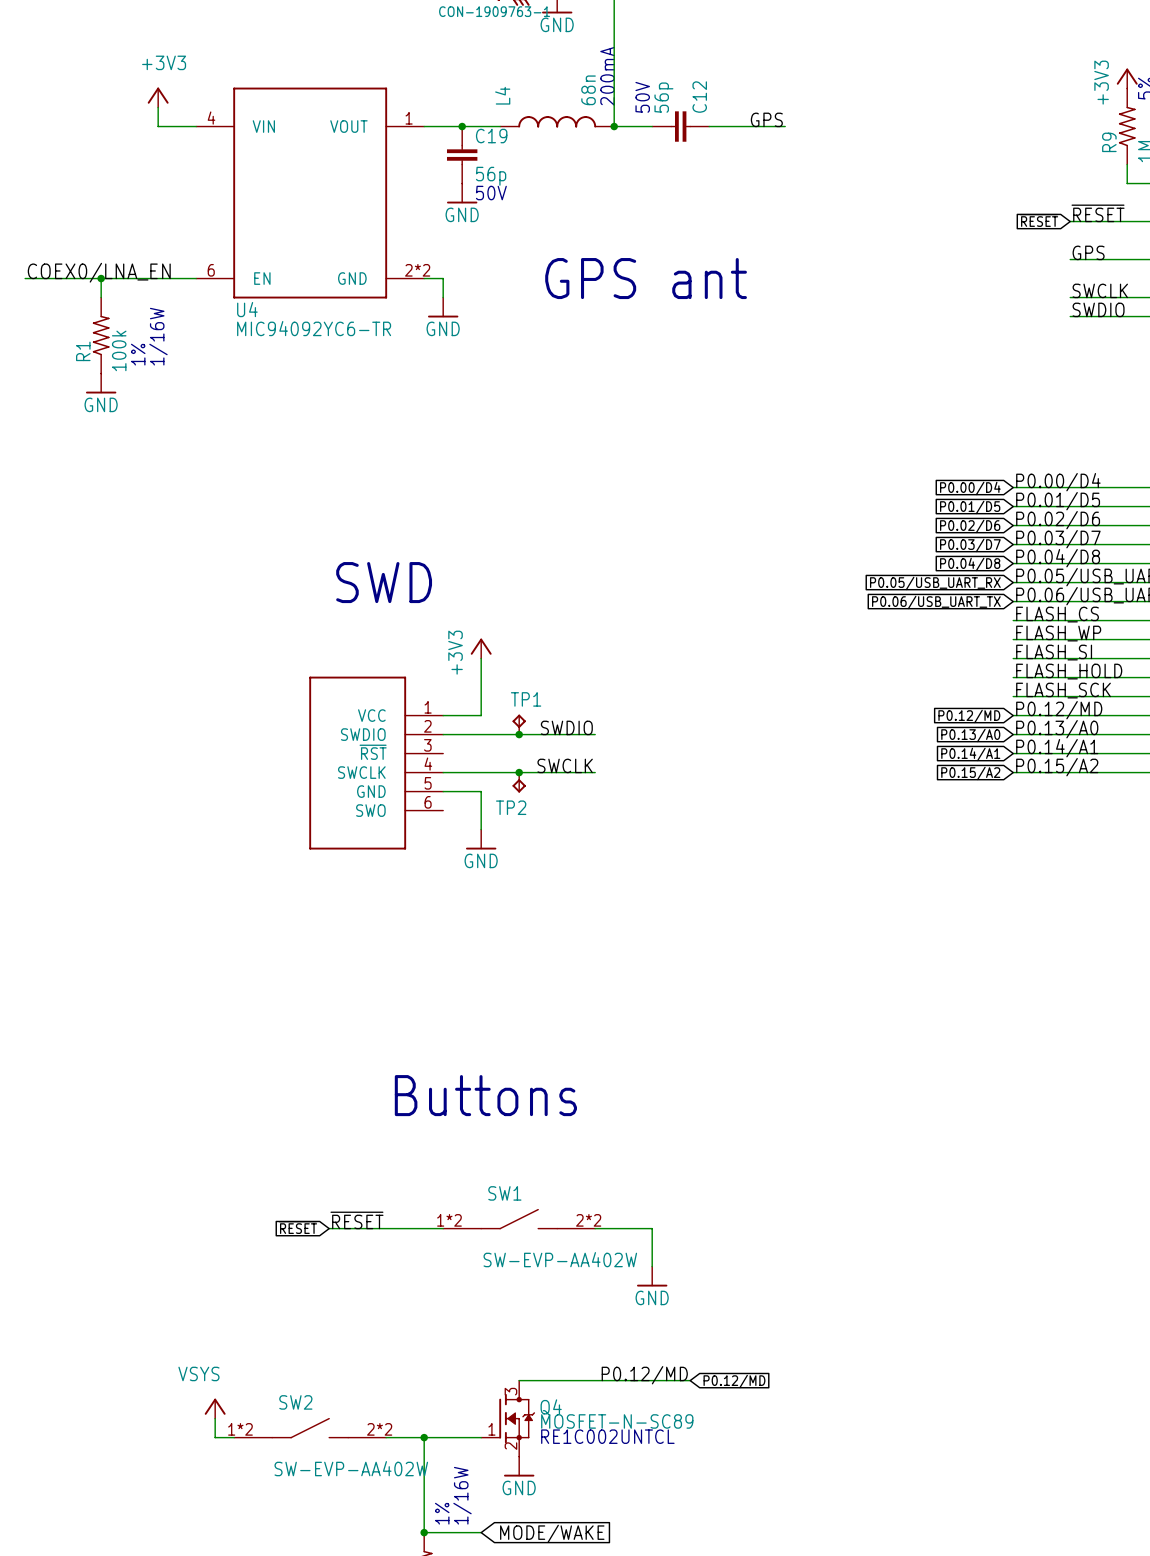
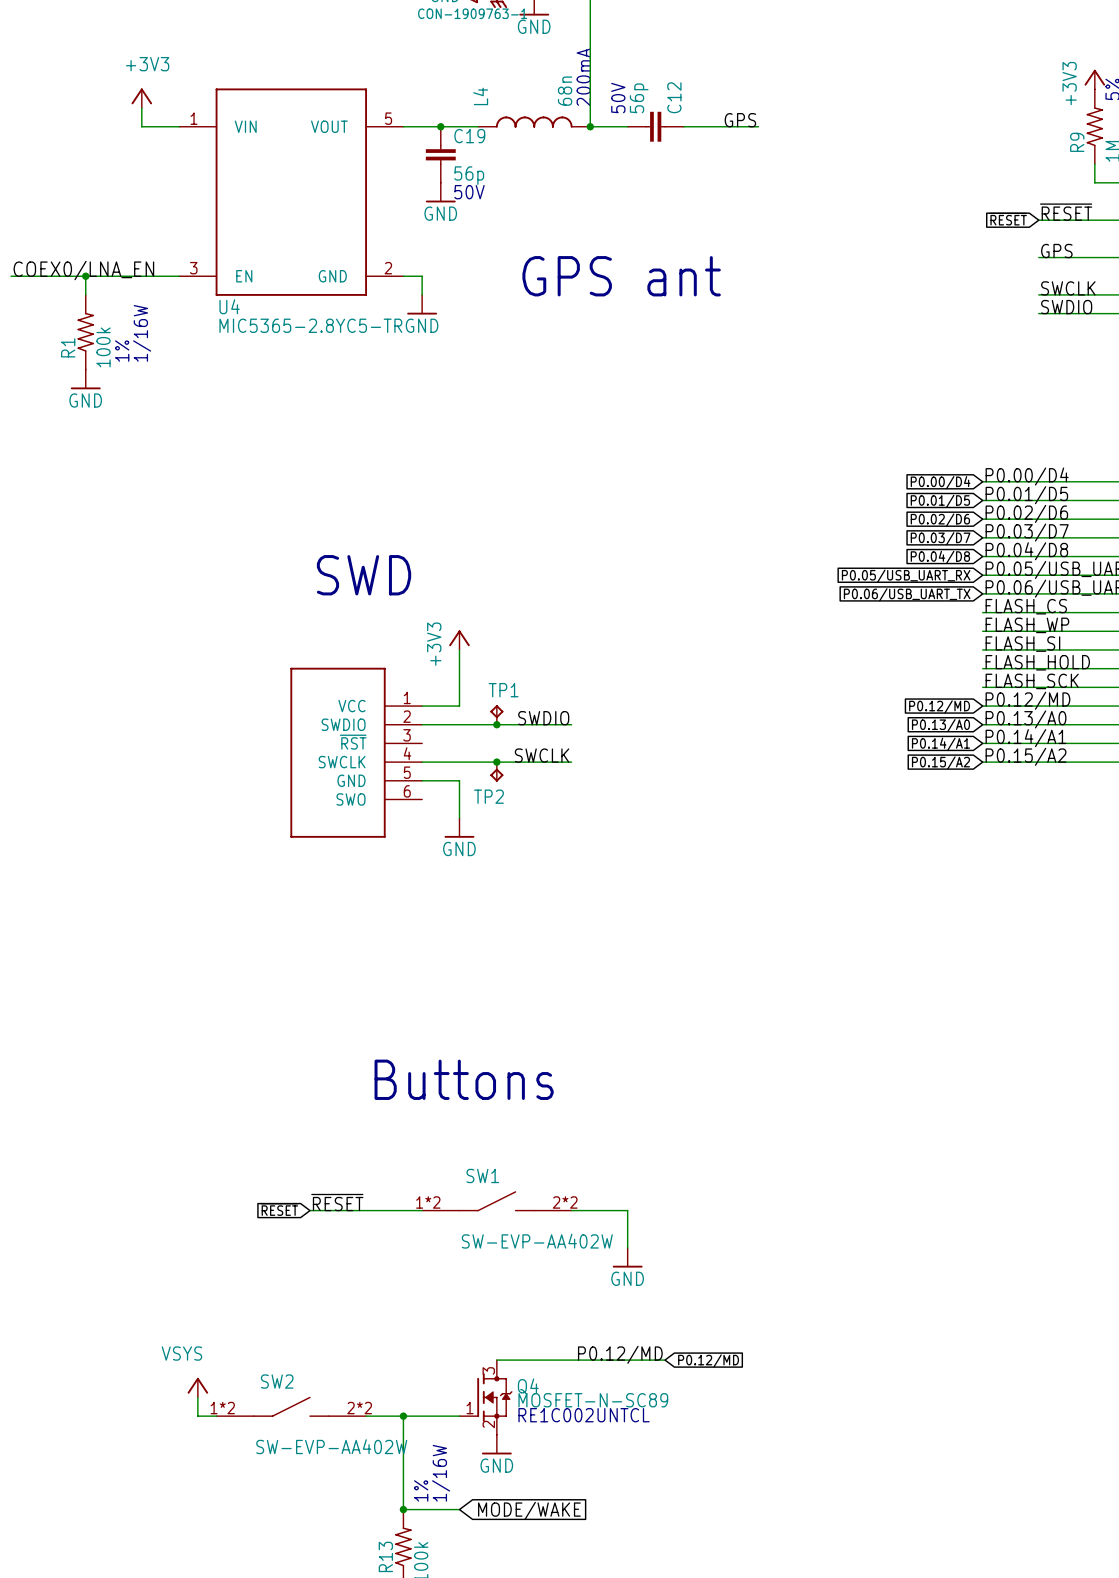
U4 pin number: 4 (211, 118) -> 1 (194, 118)
U4 pin number: 1 (409, 118) -> 5 (388, 118)
U4 pin number: 6 (211, 270) -> 3 (193, 268)
U4 pin number: 2*2 (417, 270) -> 2 (388, 268)
U4 text: MIC94092YC6-TR (314, 328) -> MIC5365-2.8YC5-TR (310, 325)

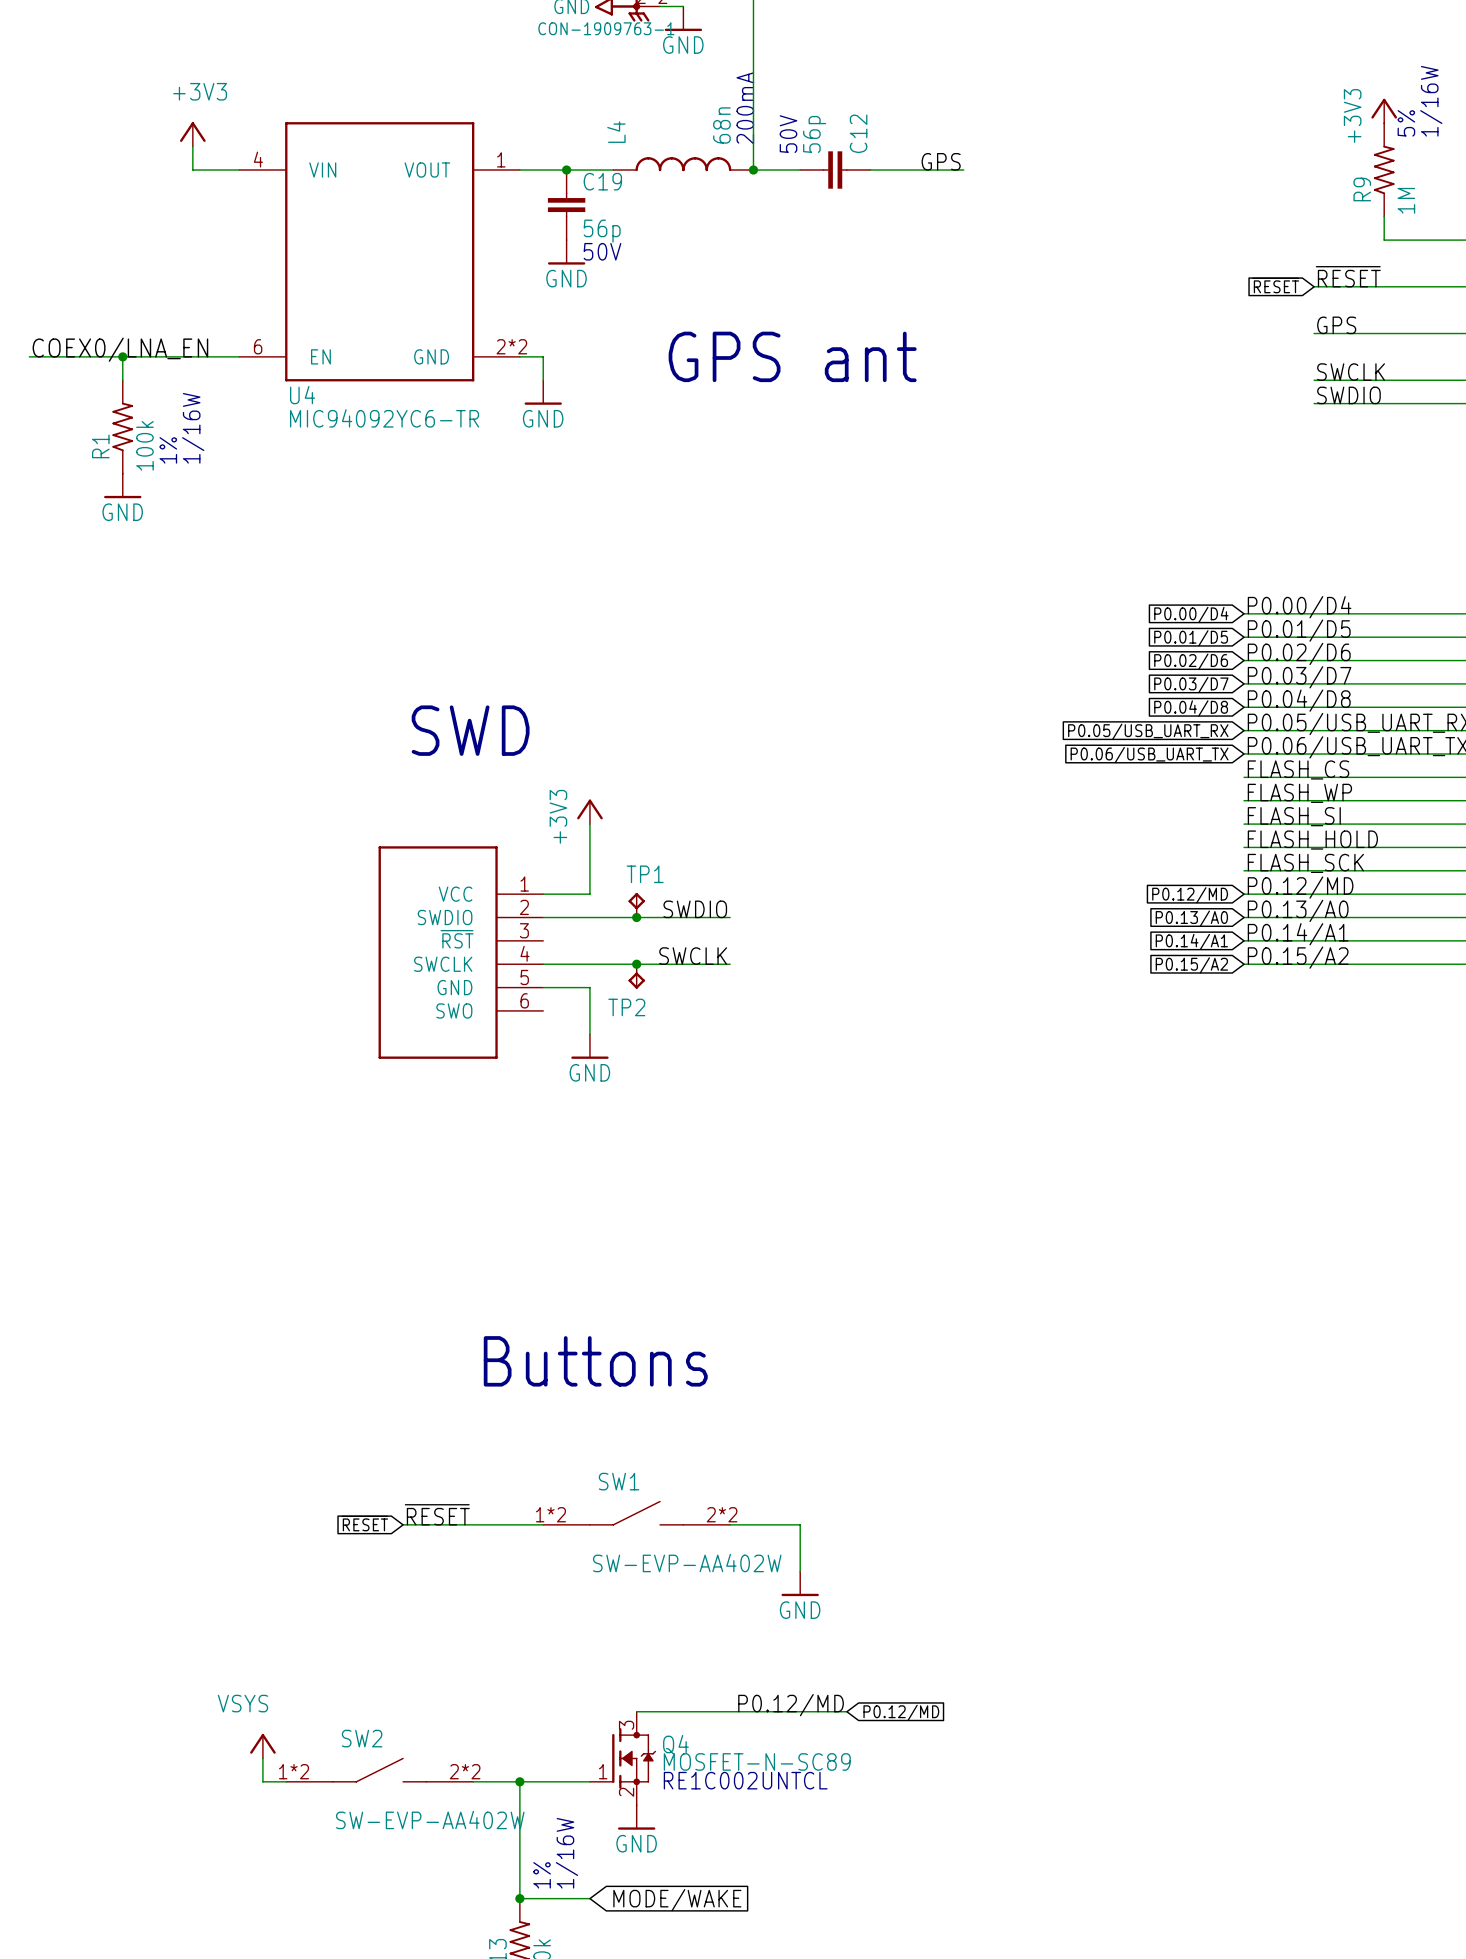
U4 pin number: 1 (194, 118) -> 4 (258, 159)
U4 pin number: 5 (388, 118) -> 1 (501, 159)
U4 pin number: 3 (193, 268) -> 6 (258, 346)
U4 pin number: 2 (388, 268) -> 2*2 (511, 346)
U4 text: MIC5365-2.8YC5-TR (310, 325) -> MIC94092YC6-TR (384, 418)

